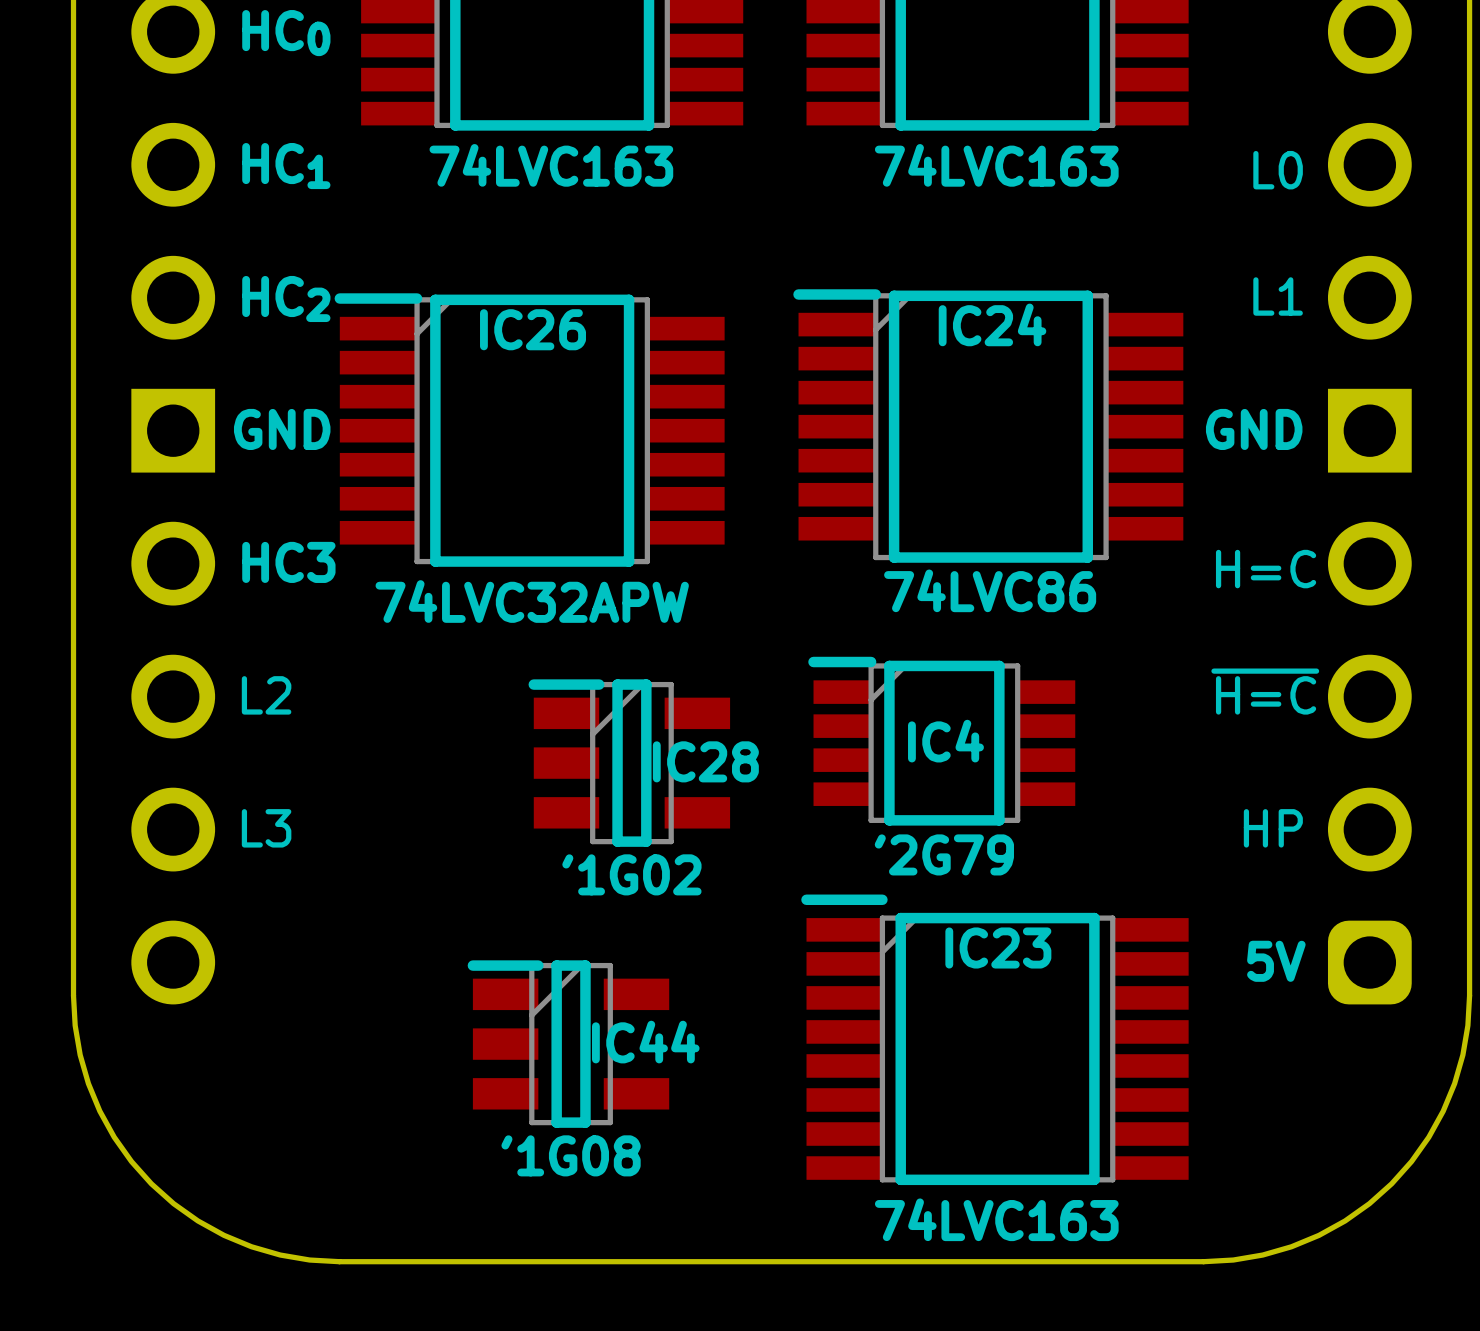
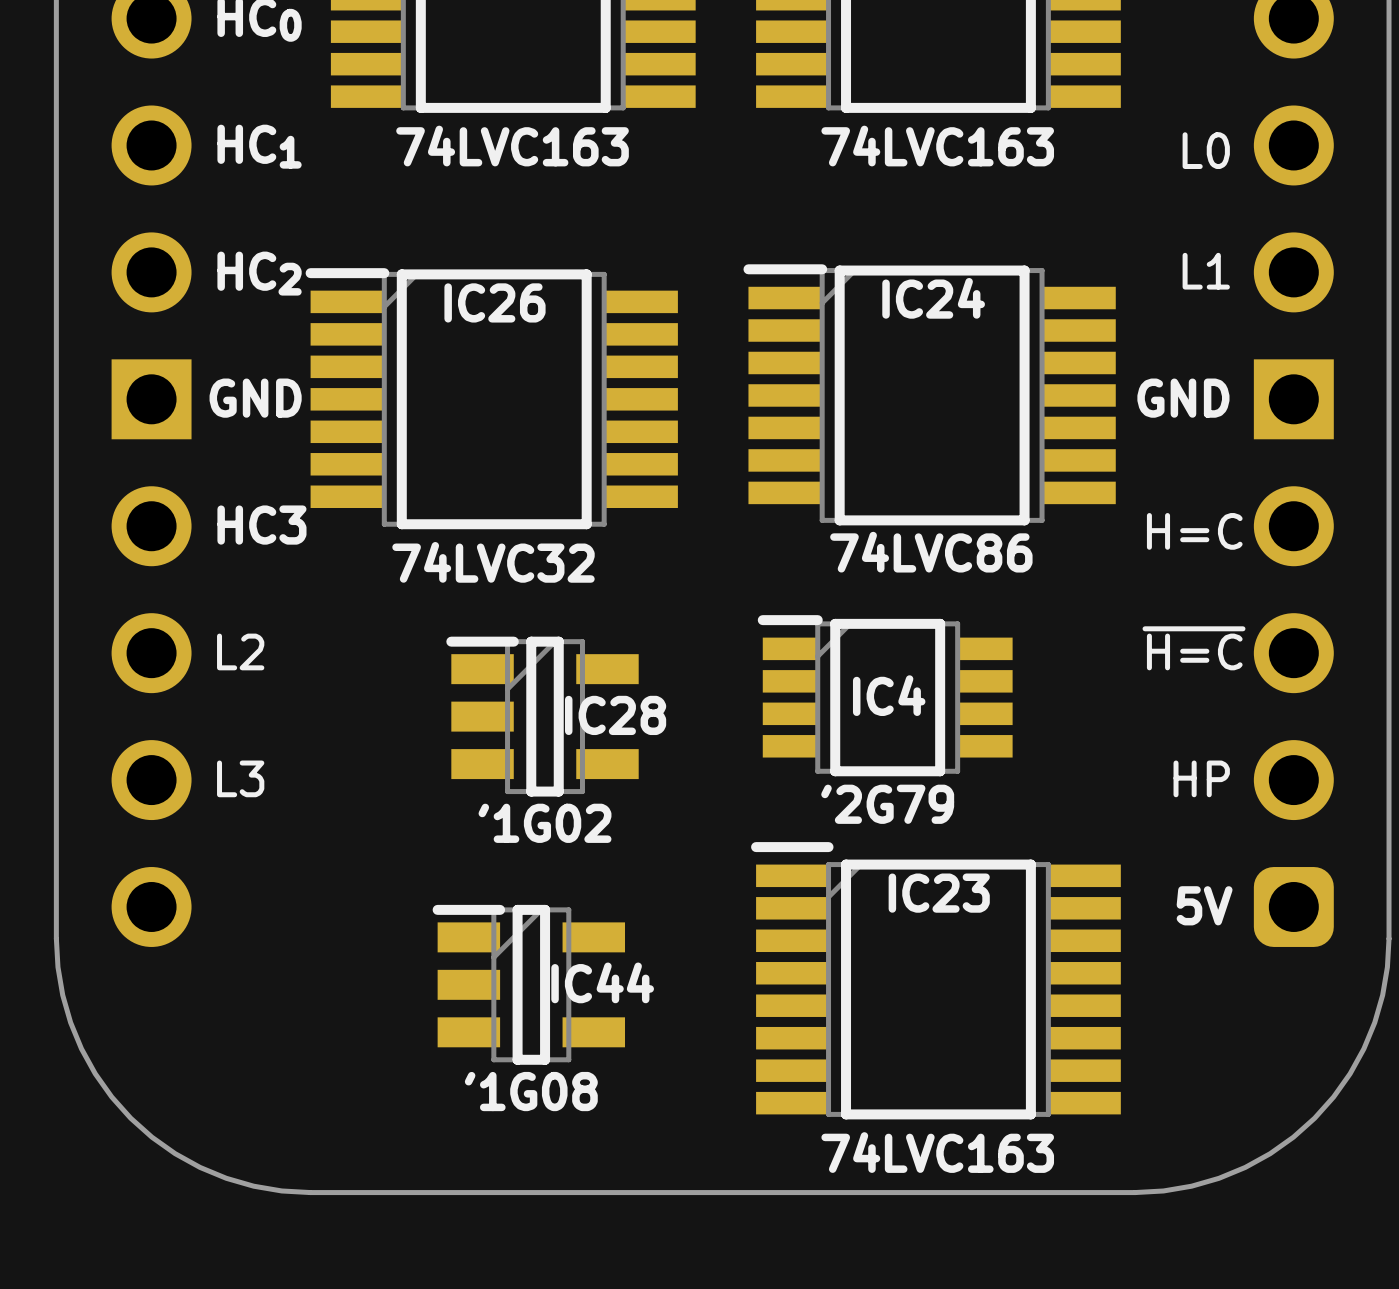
IC26 text: 74LVC32APW (532, 601) -> 74LVC32 (493, 562)
IC28 position: (629, 763) -> (542, 716)

